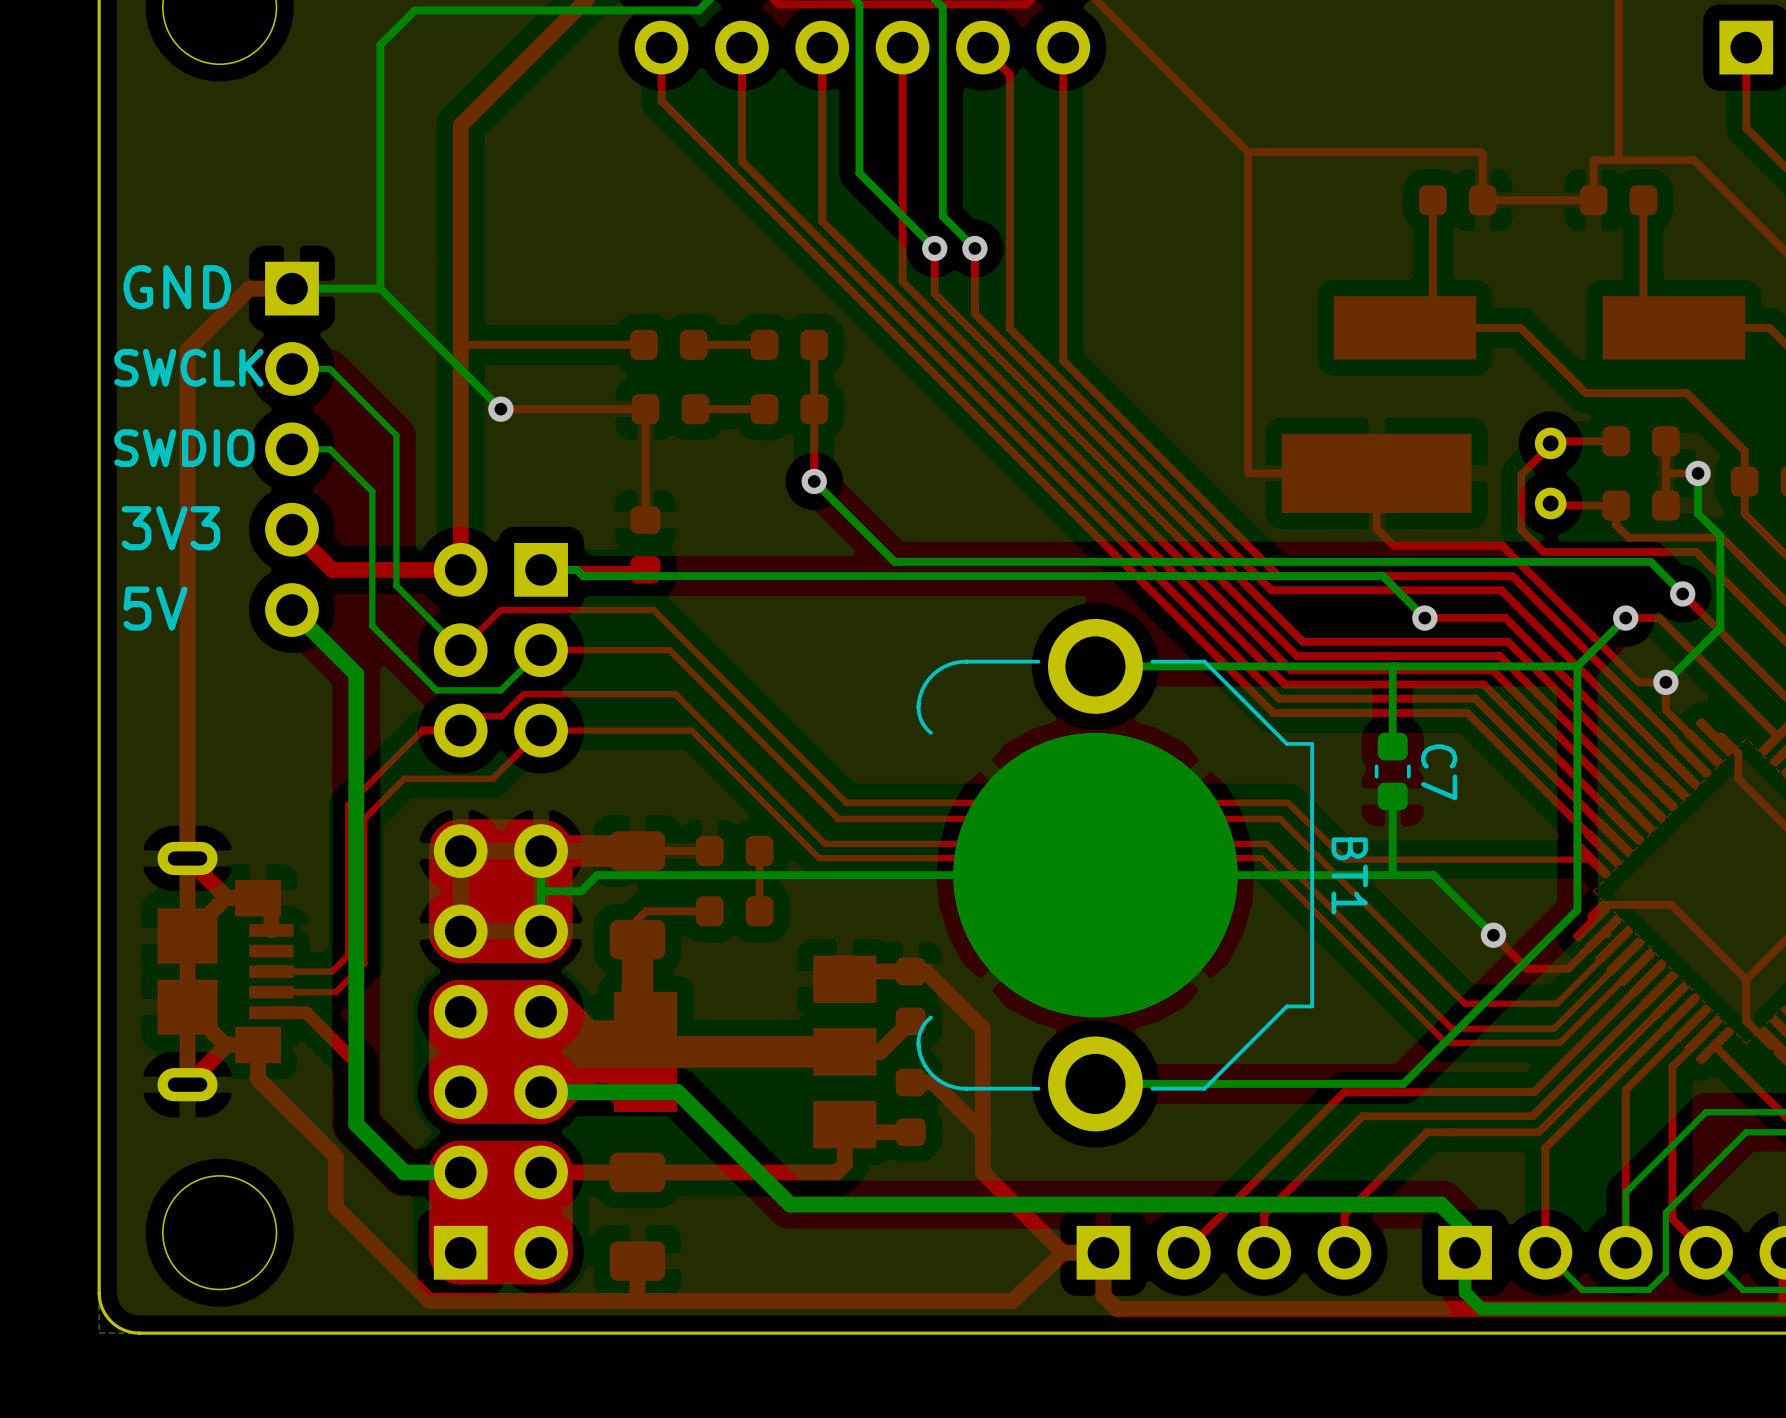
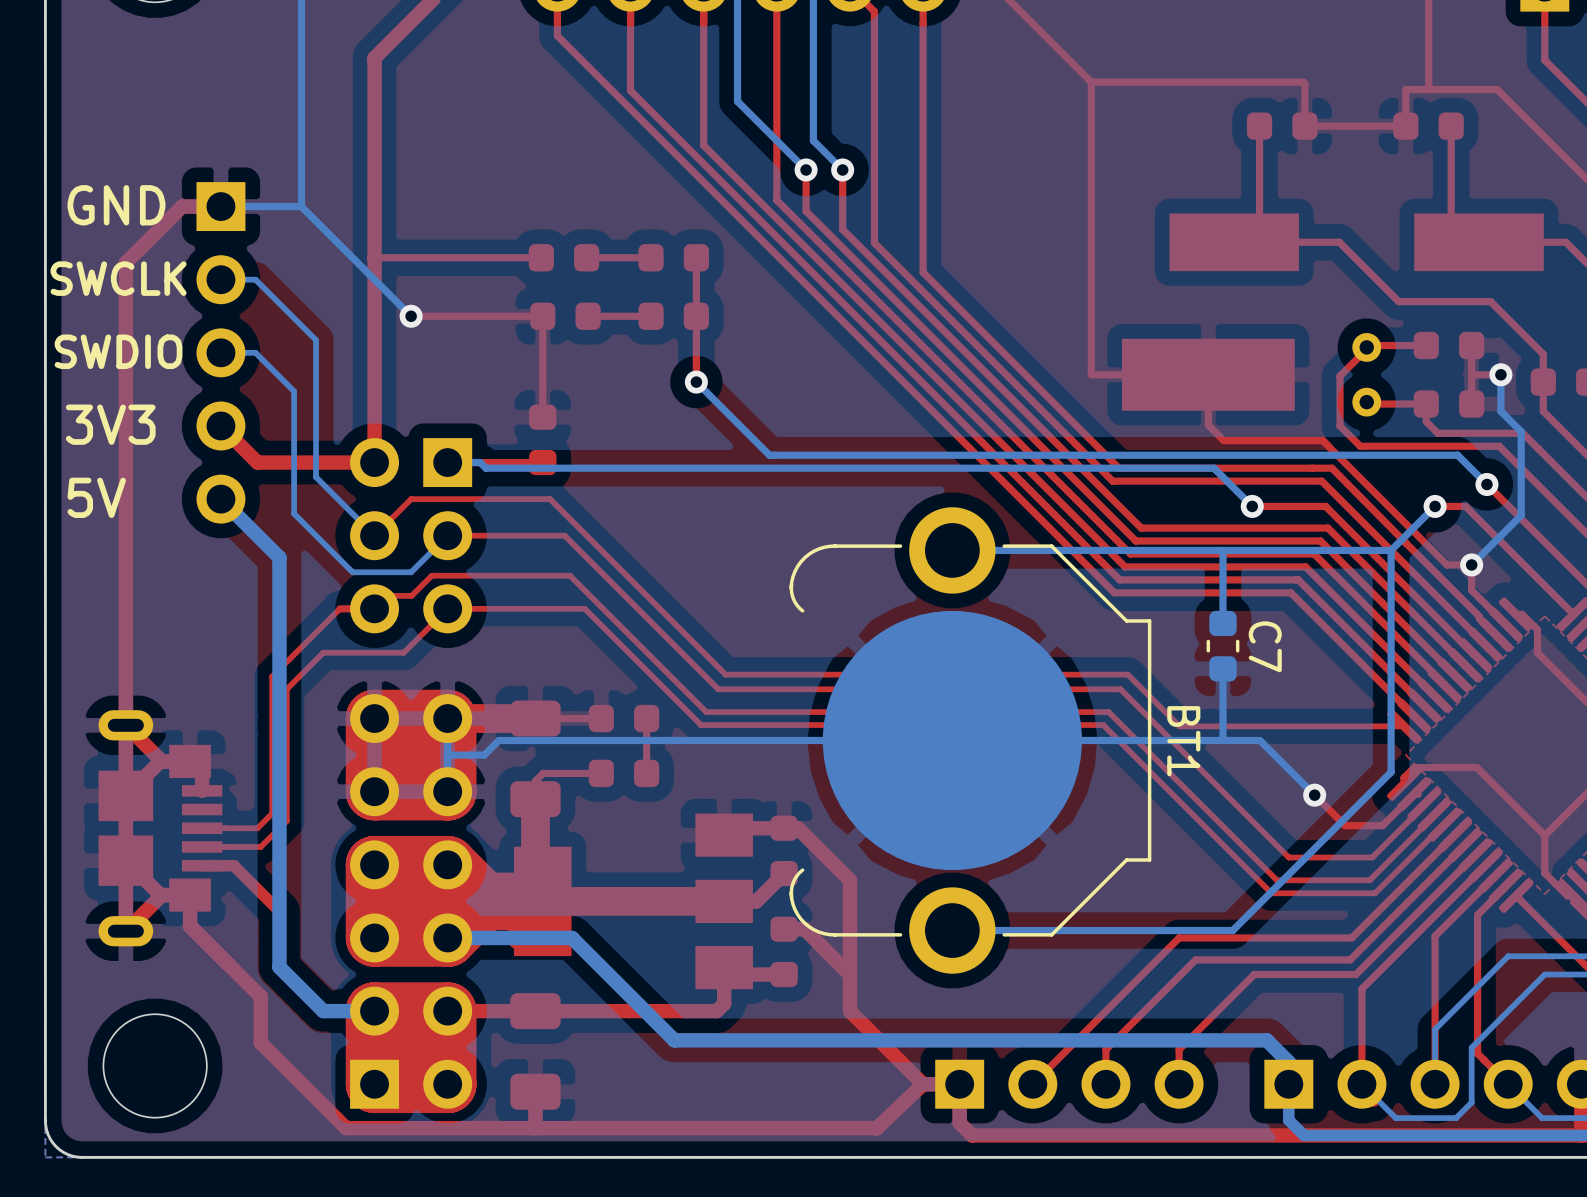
text position: SWCLK (188, 367) -> SWCLK (118, 278)
text position: SWDIO (184, 448) -> SWDIO (118, 351)

